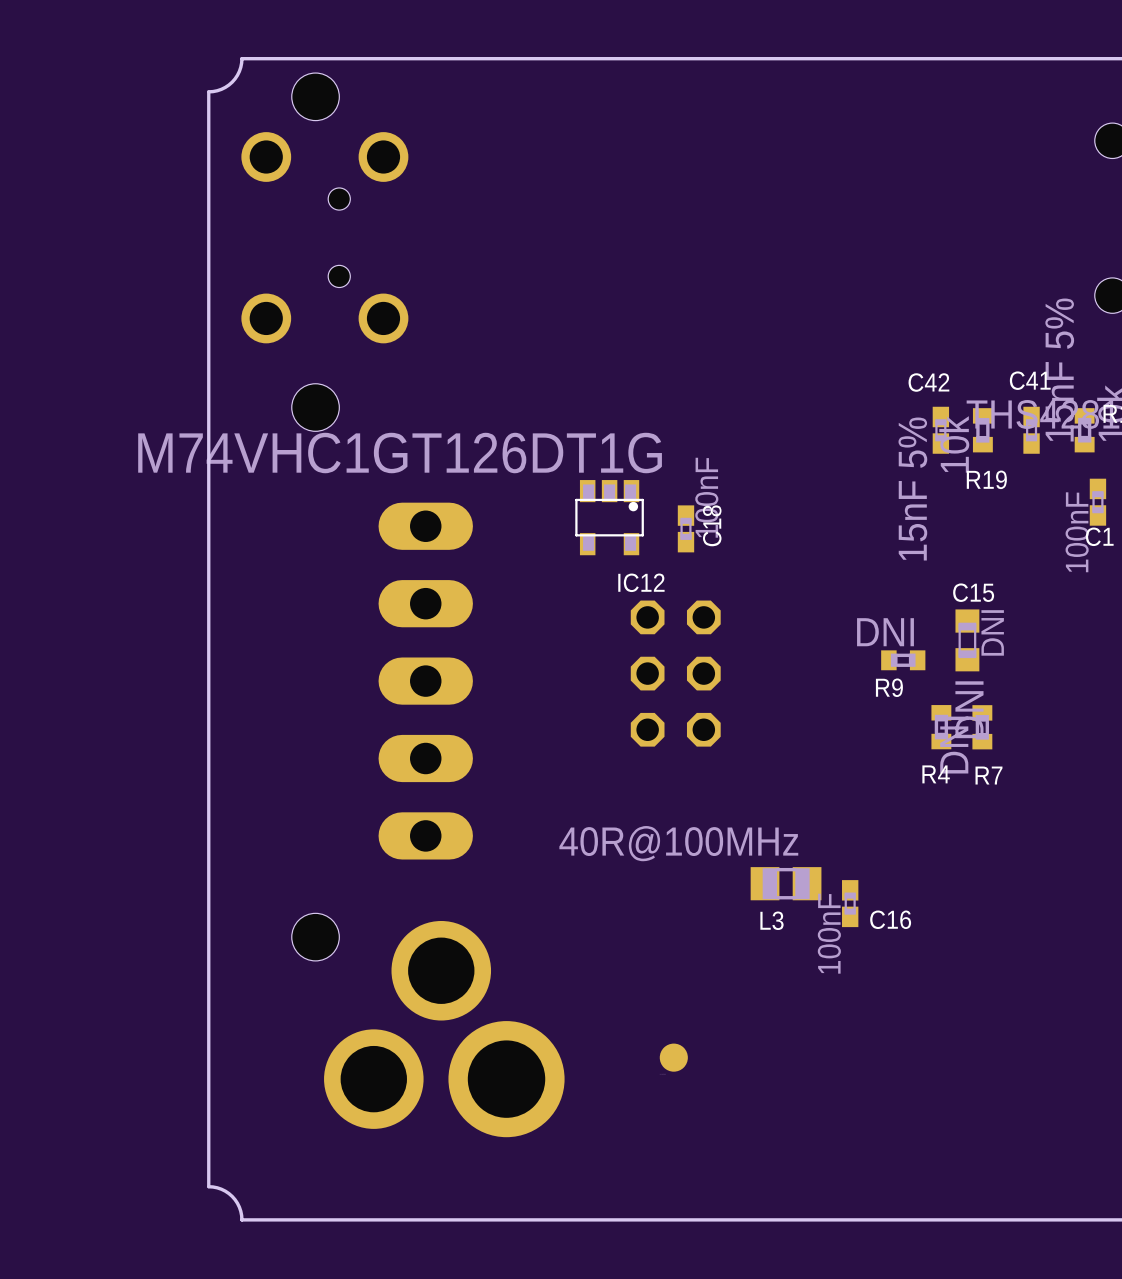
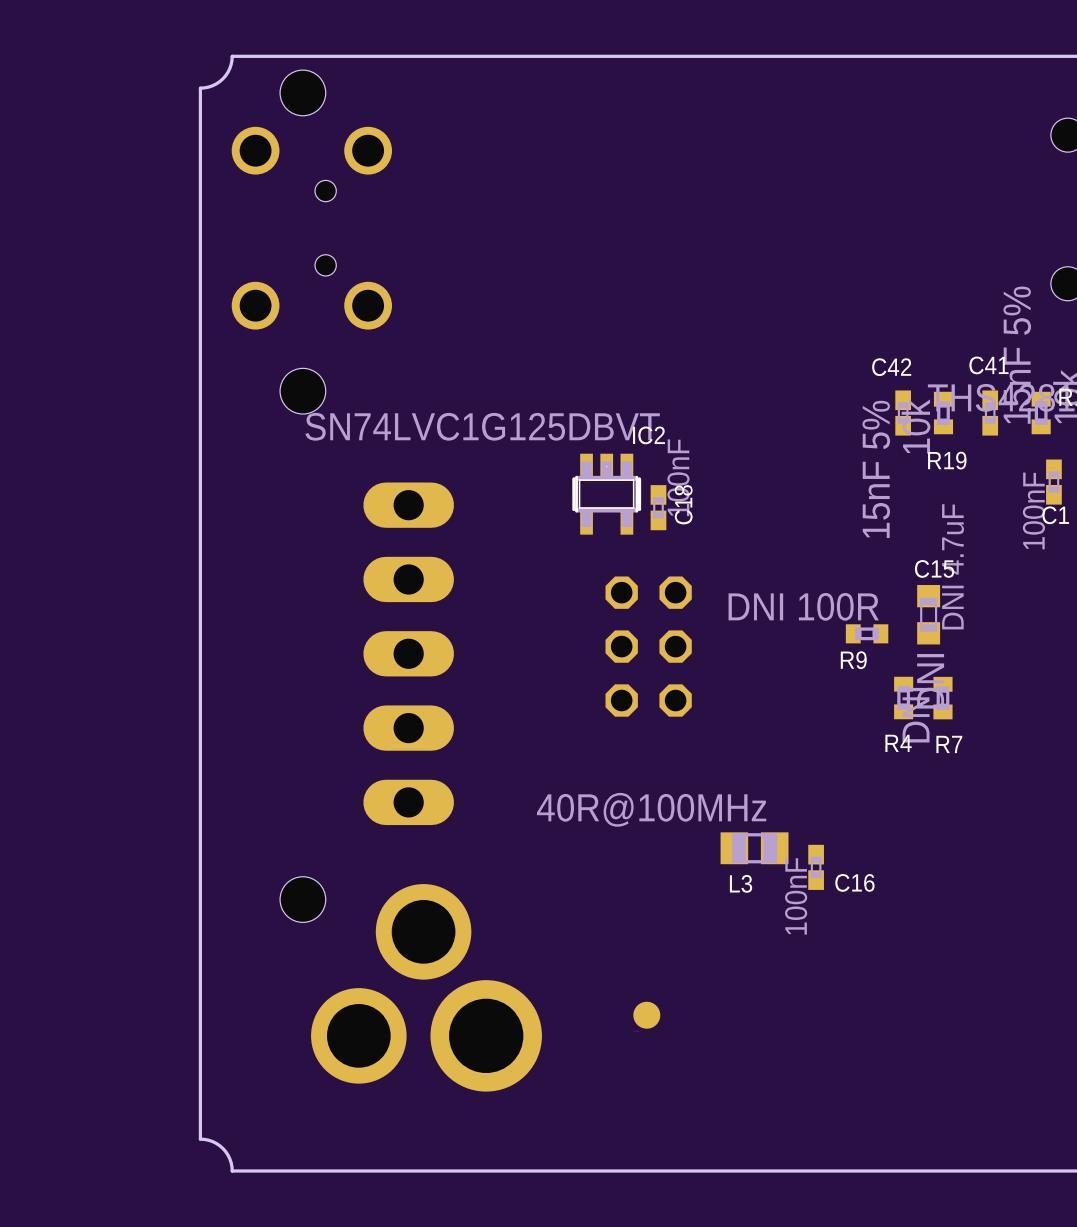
IC2: none -> SN74LVC1G125DBVT (606, 494)
IC12: M74VHC1GT126DT1G (609, 517) -> none
R9 value: DNI (885, 632) -> DNI 100R (803, 606)
C15 value: DNI (992, 632) -> DNI 4.7uF (953, 566)

